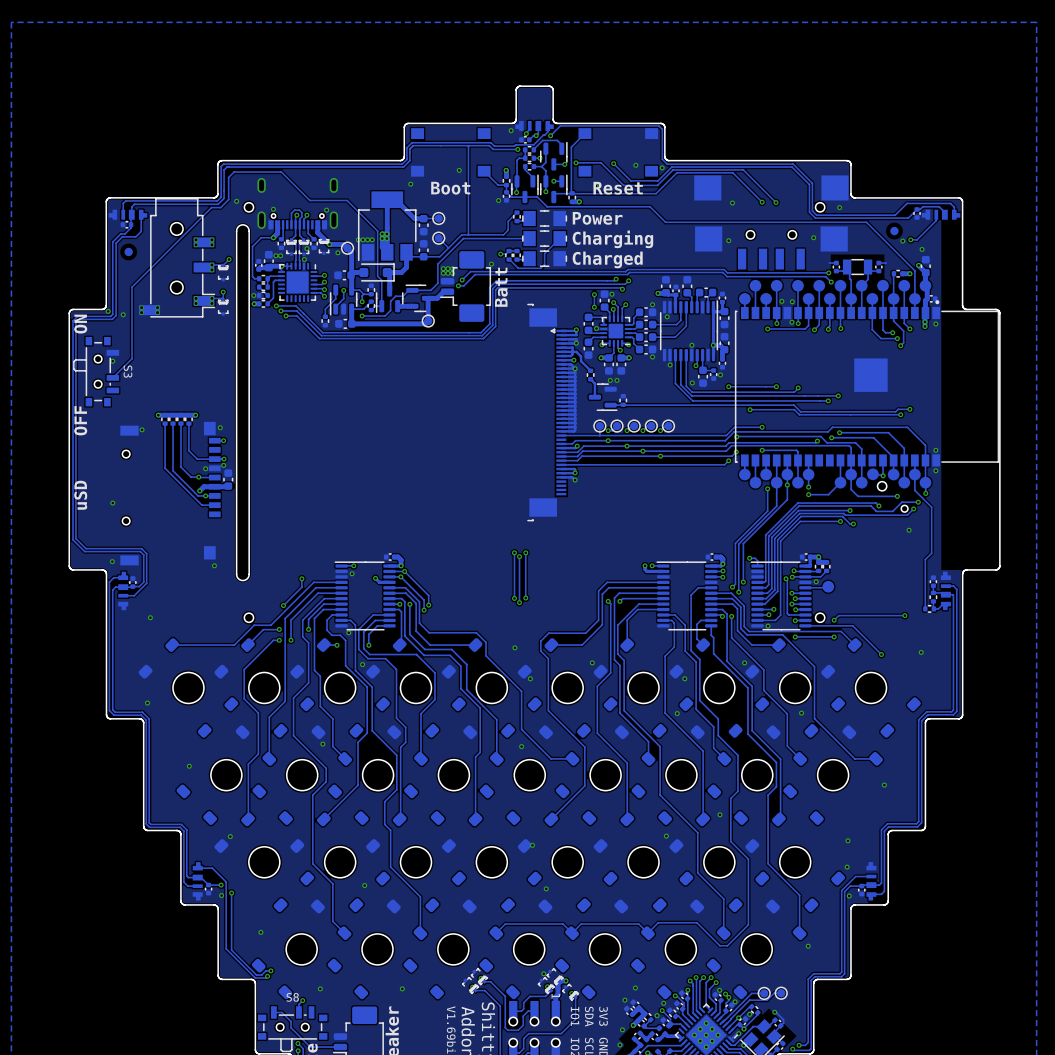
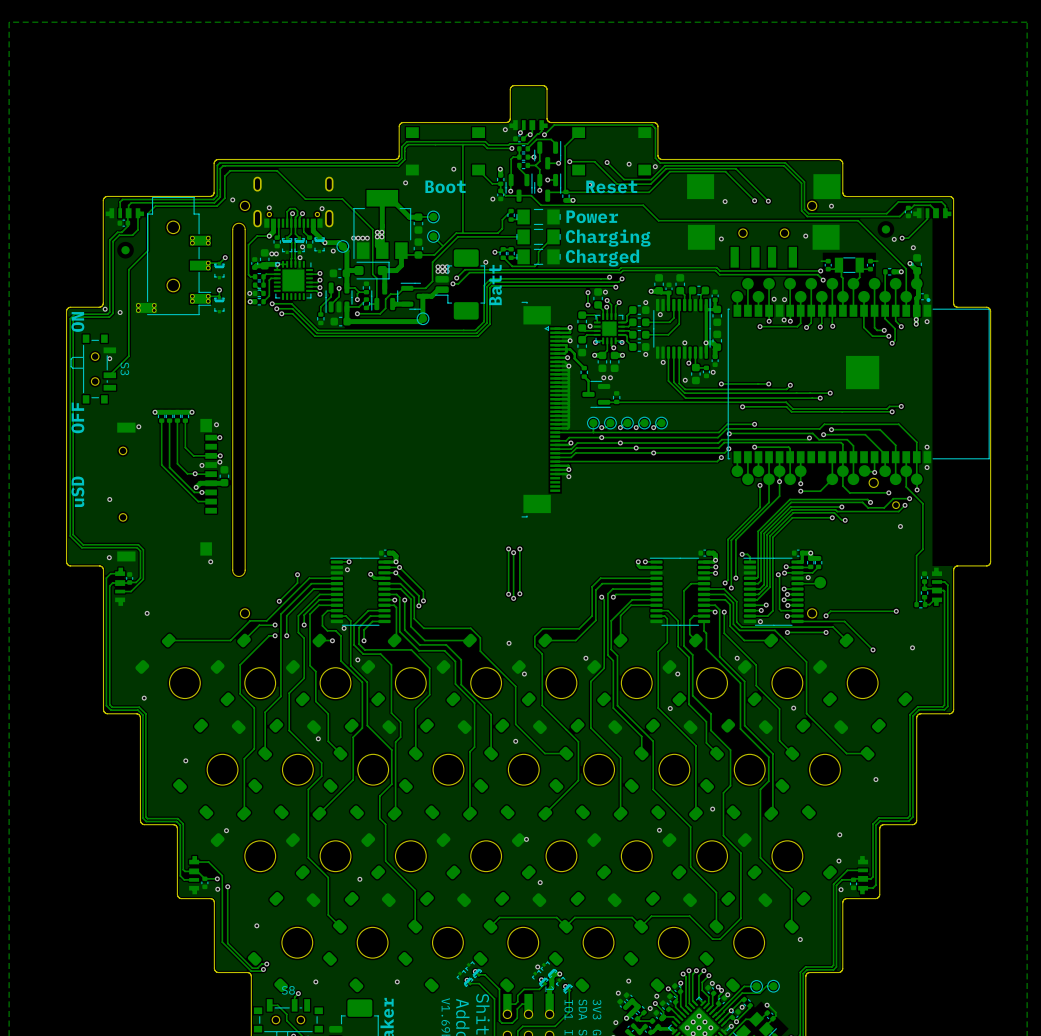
track: (211, 207) (132, 287) -> (207, 206) (155, 206) (147, 213) (147, 250) (128, 269) (128, 285)

